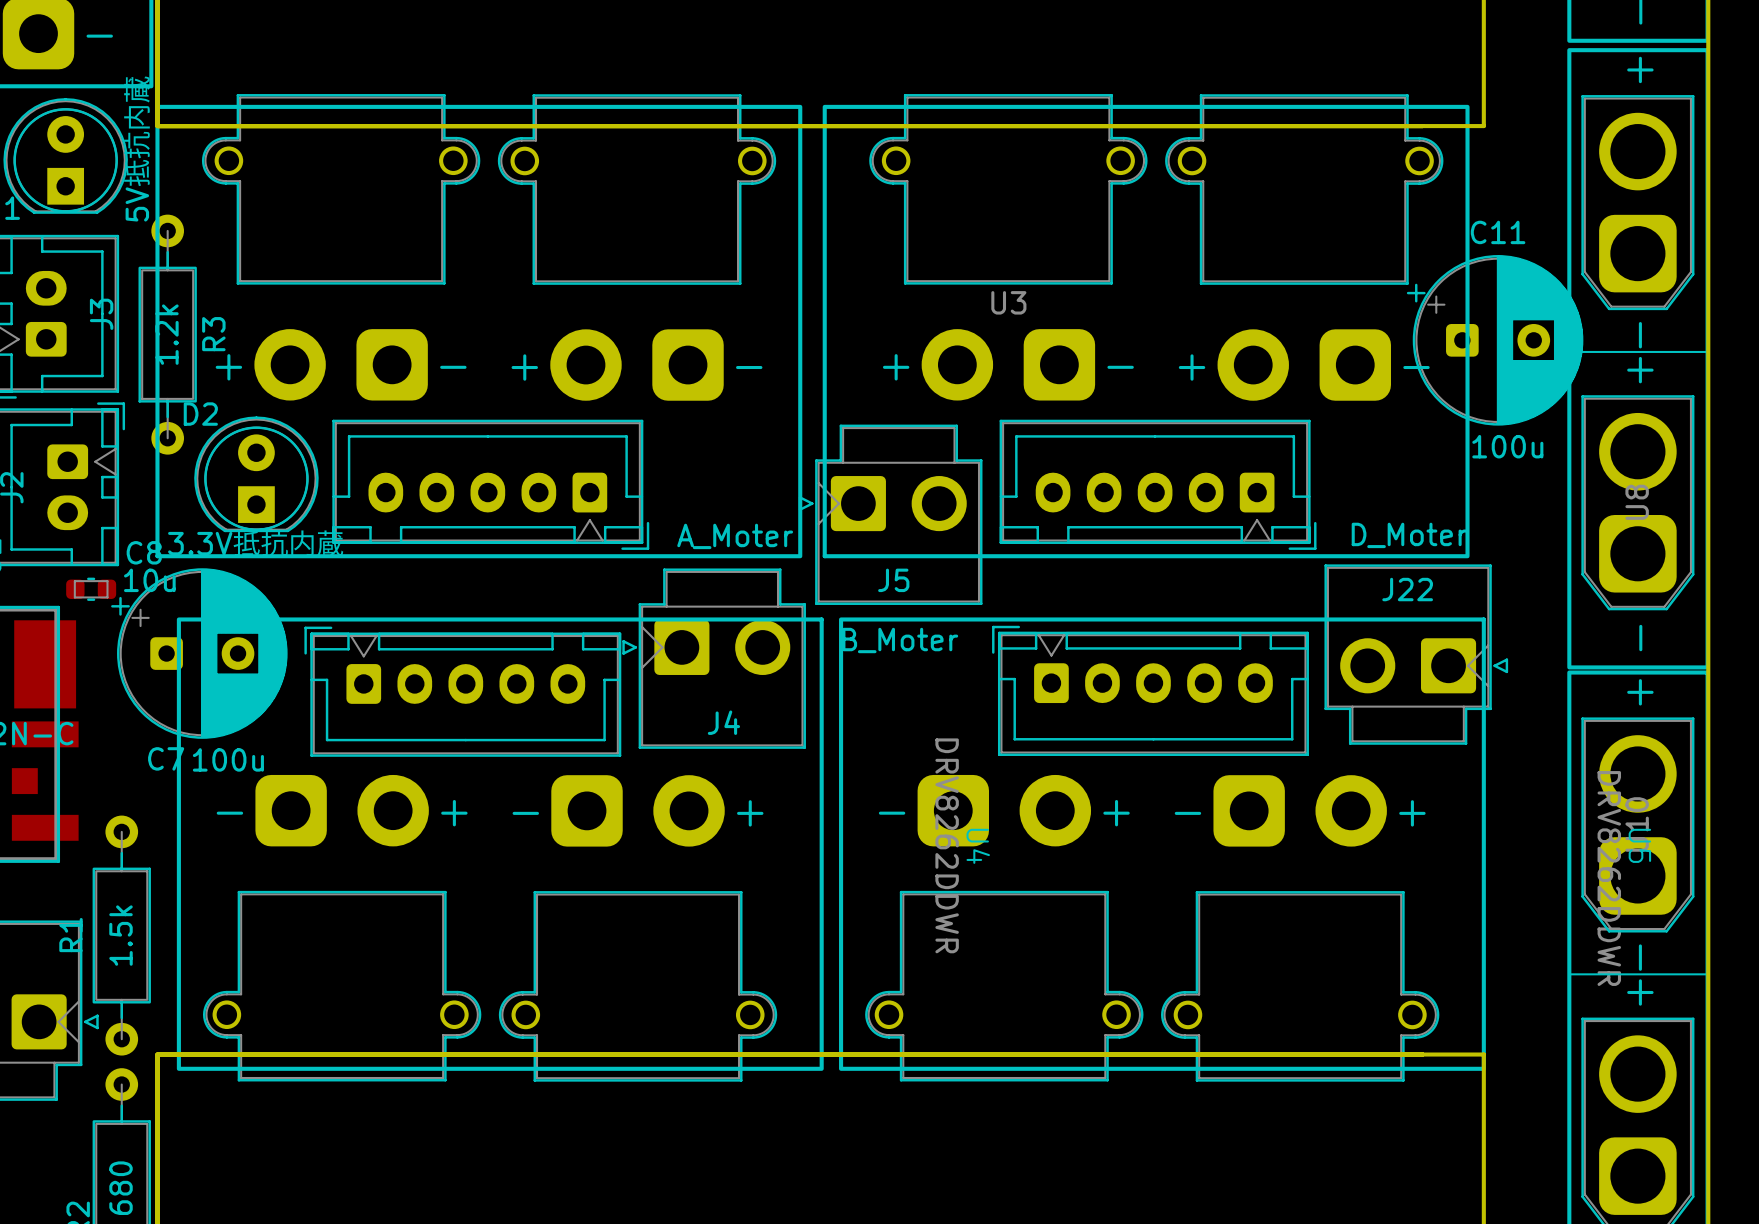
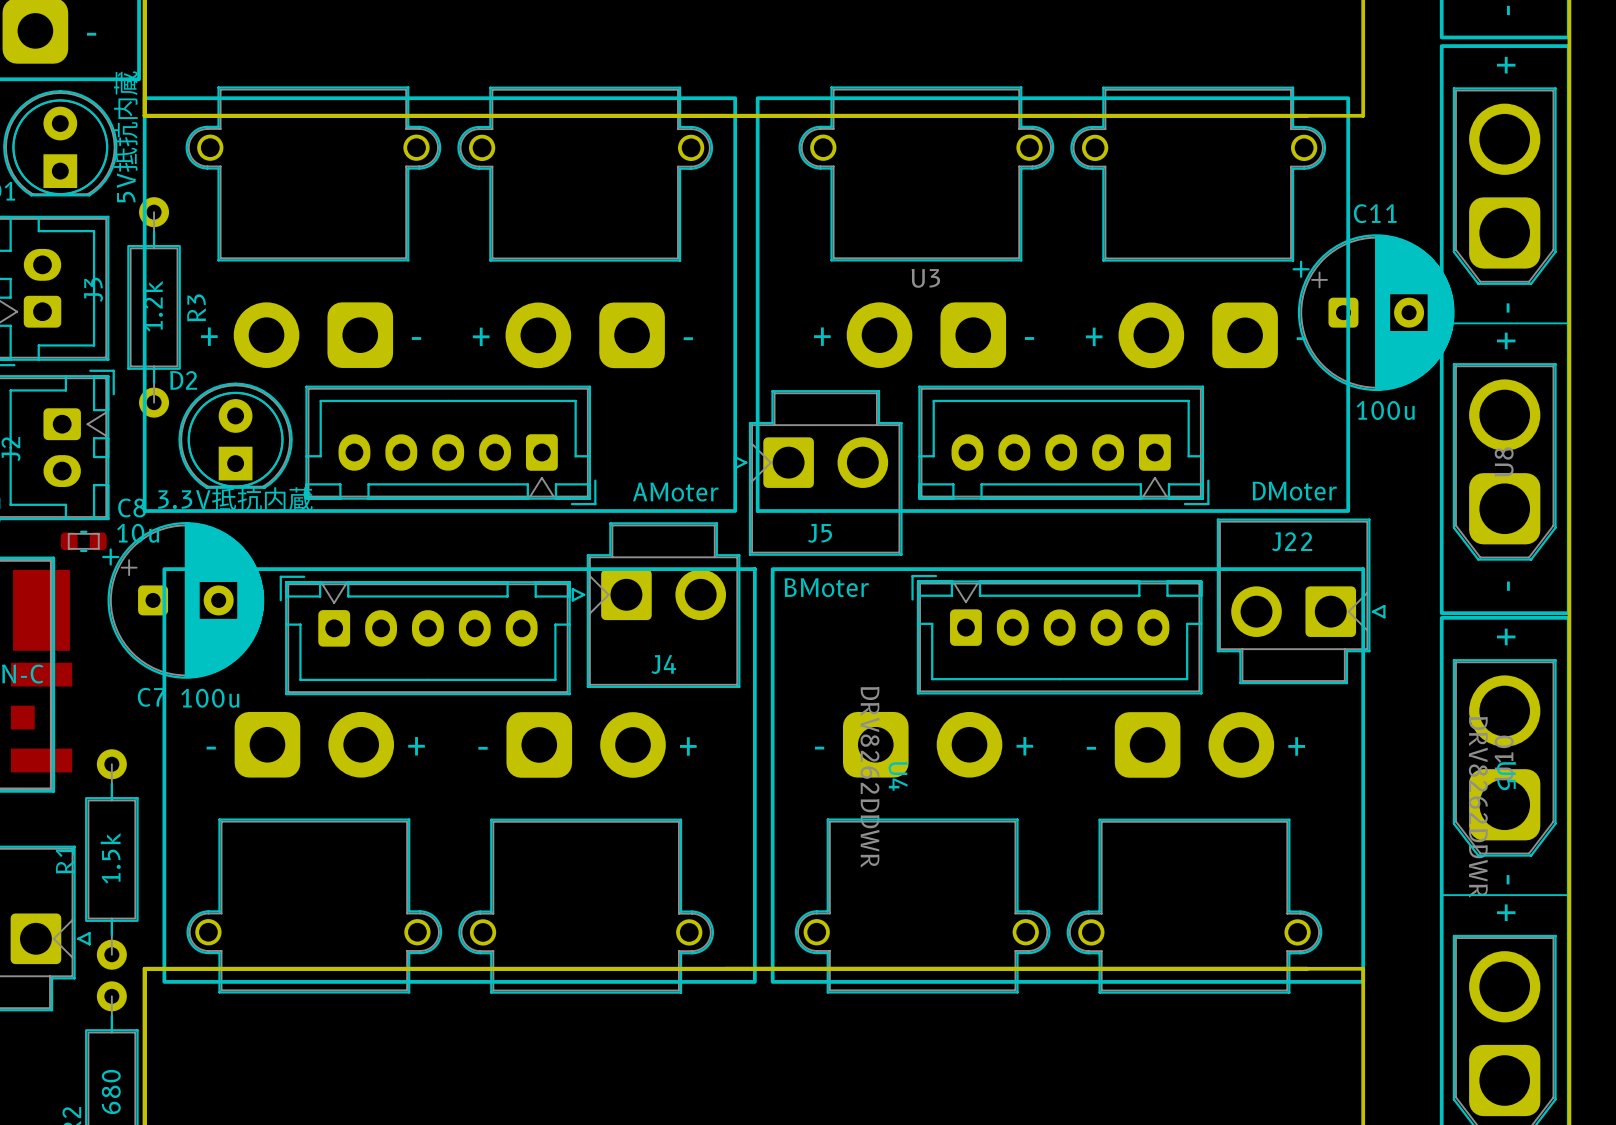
J22 value: D_Moter (1409, 535) -> DMoter (1294, 491)
J4 value: A_Moter (735, 536) -> AMoter (675, 492)
J5 value: B_Moter (900, 640) -> BMoter (826, 587)

